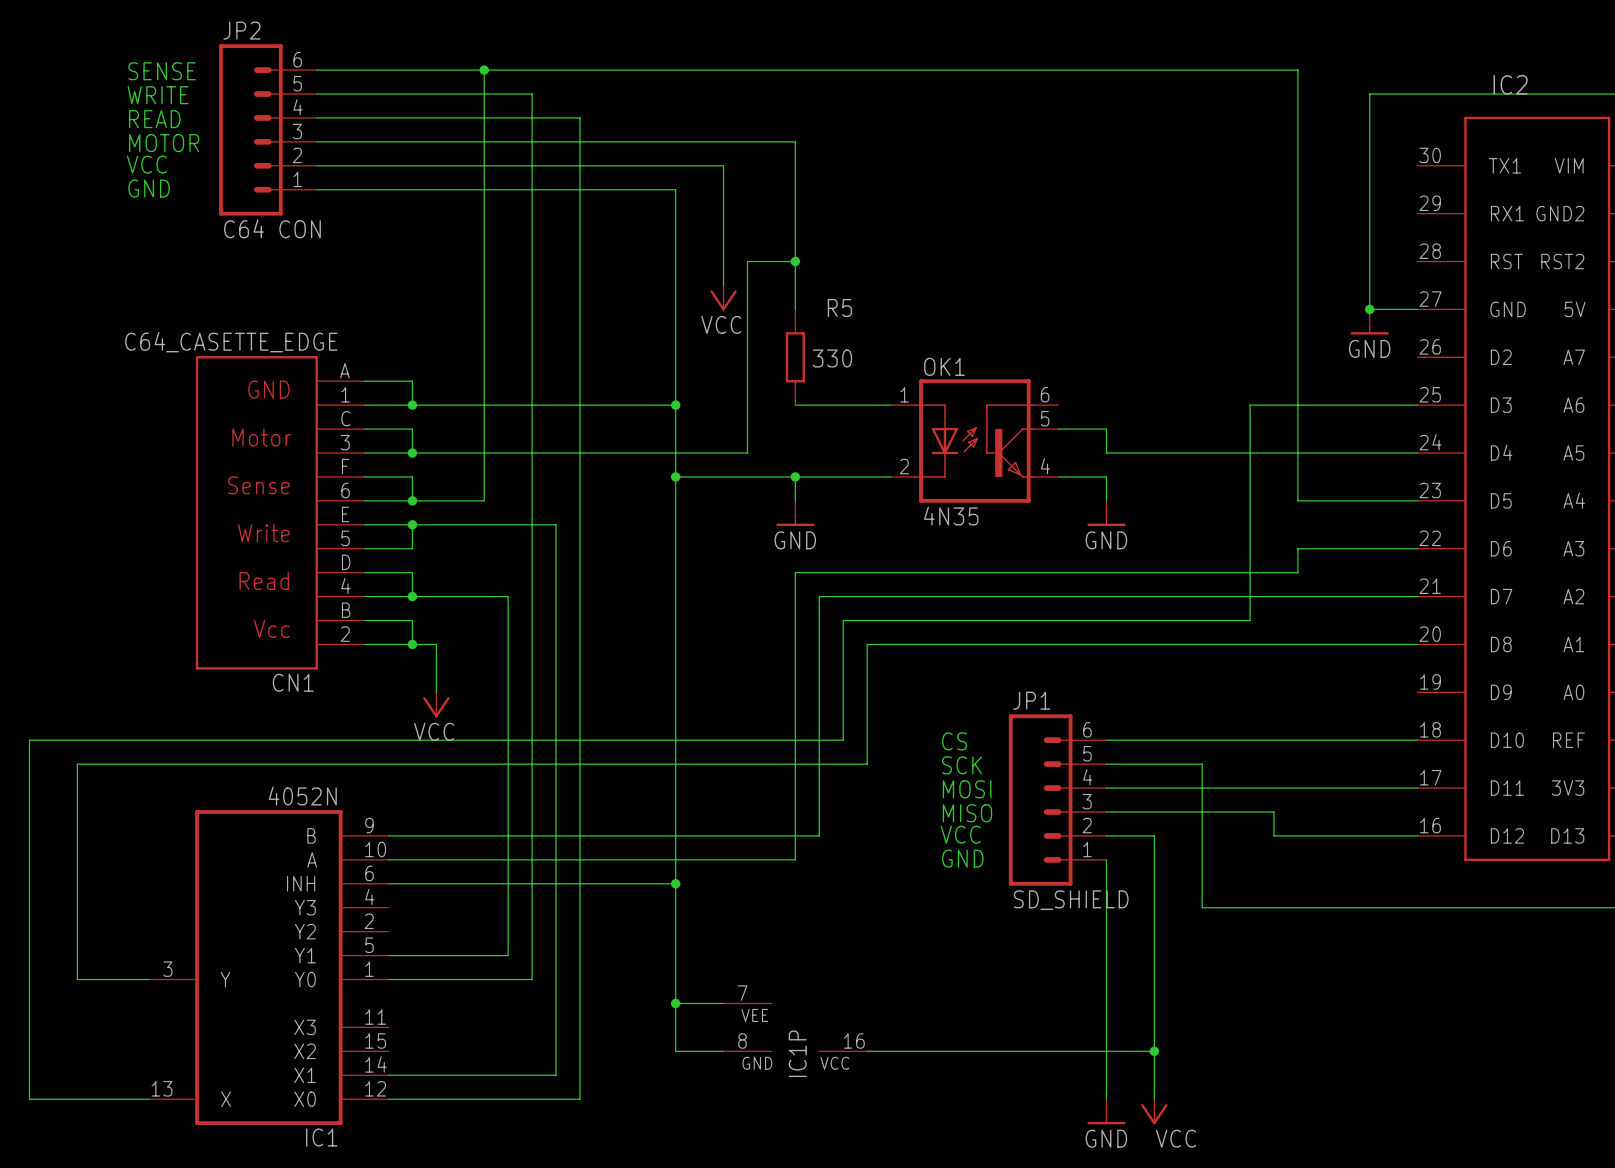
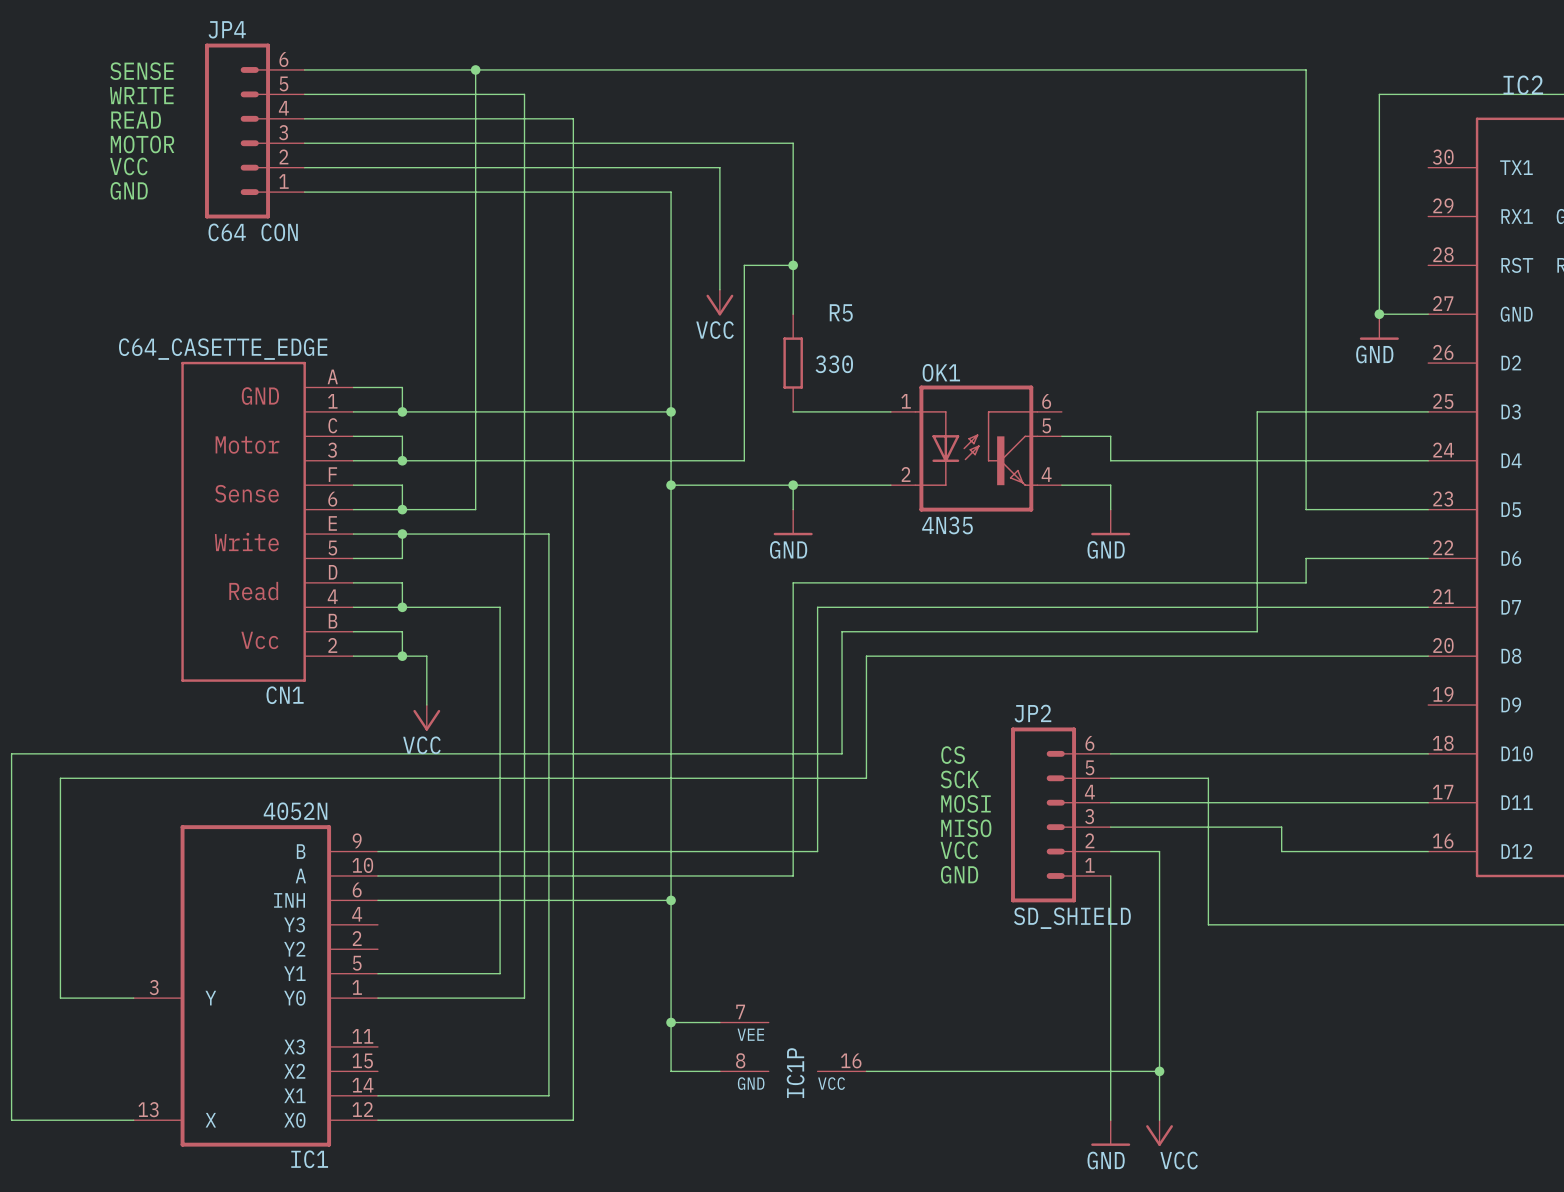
JP2 name: JP2 (241, 30) -> JP4 (227, 29)
JP1 name: JP1 (1031, 700) -> JP2 (1032, 713)

